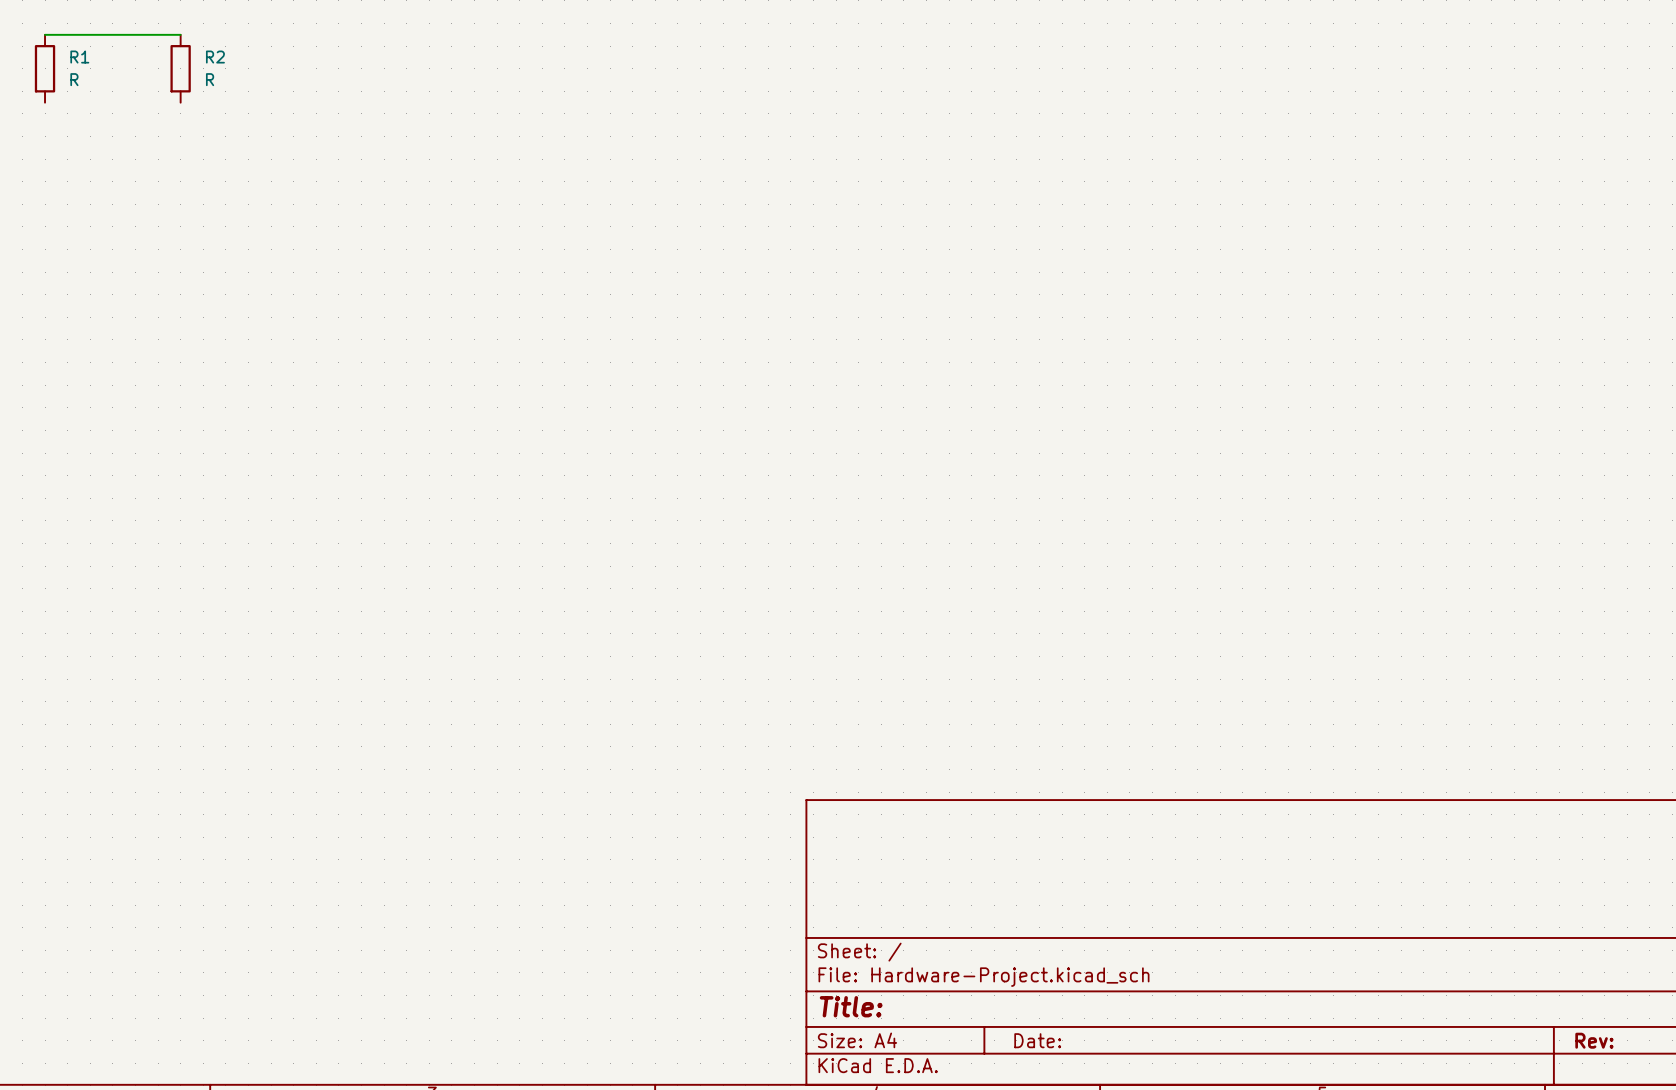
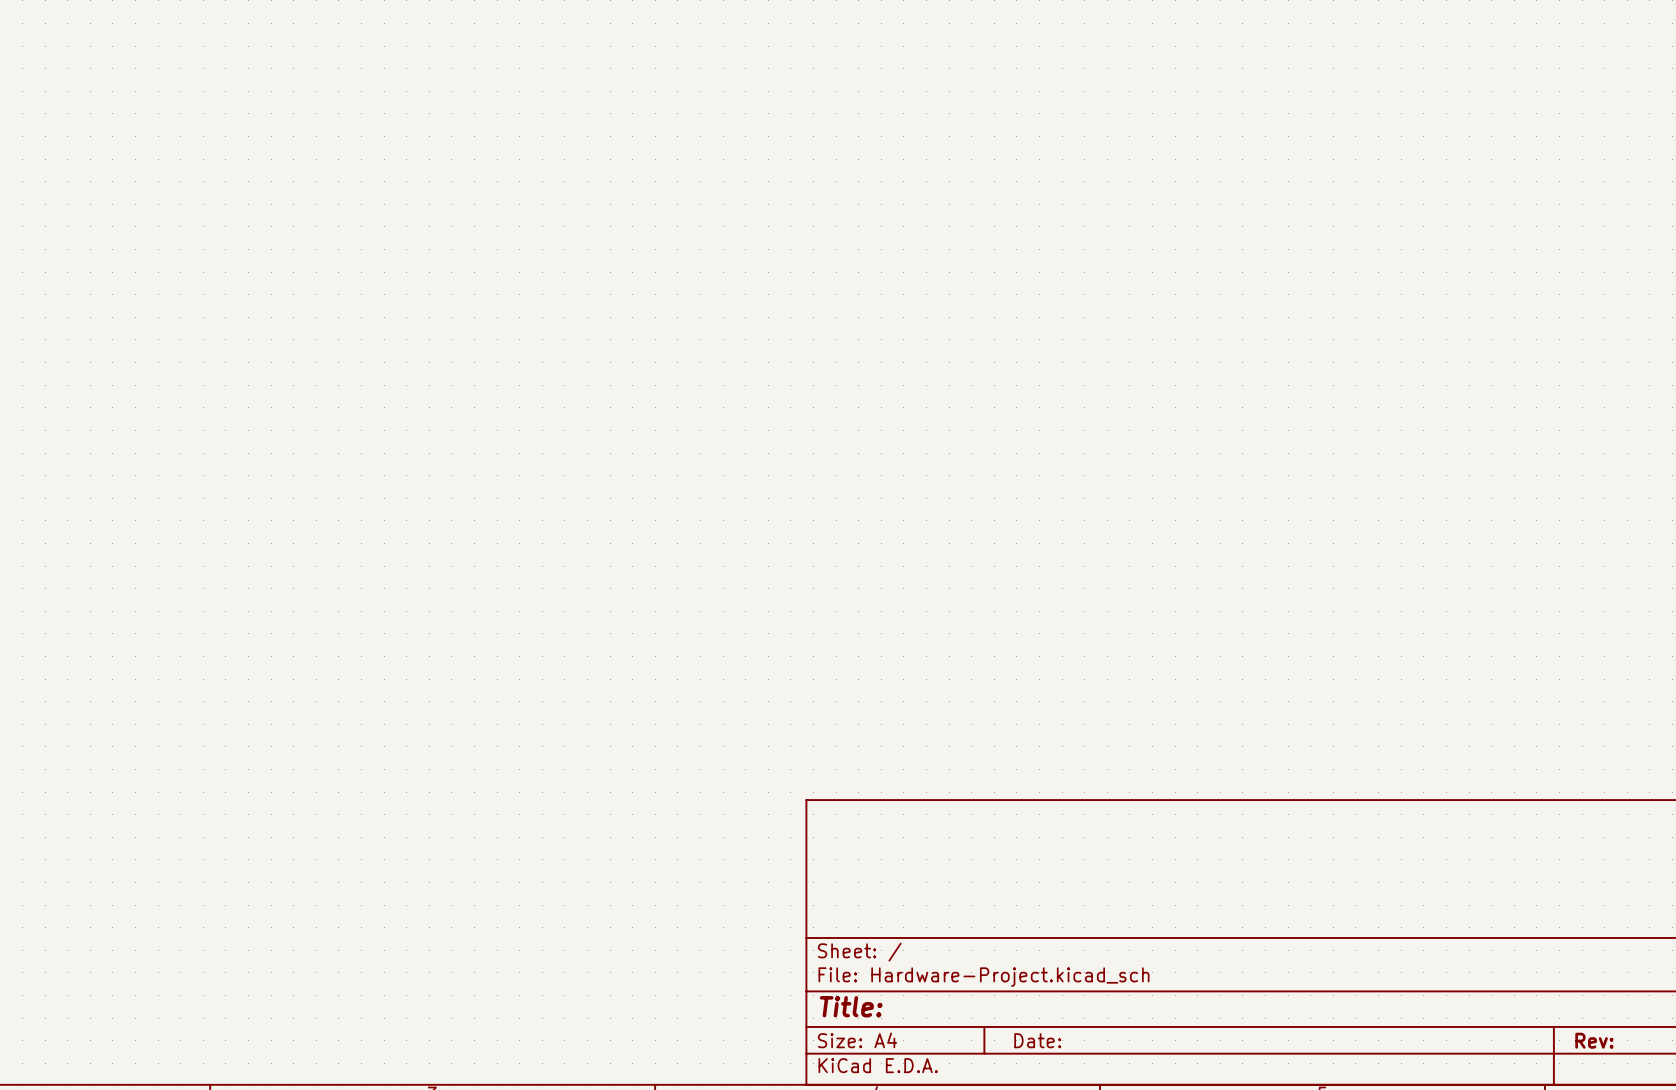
wire: (45, 34) (180, 34) -> none
R1: R (45, 68) -> none
R2: R (180, 68) -> none

